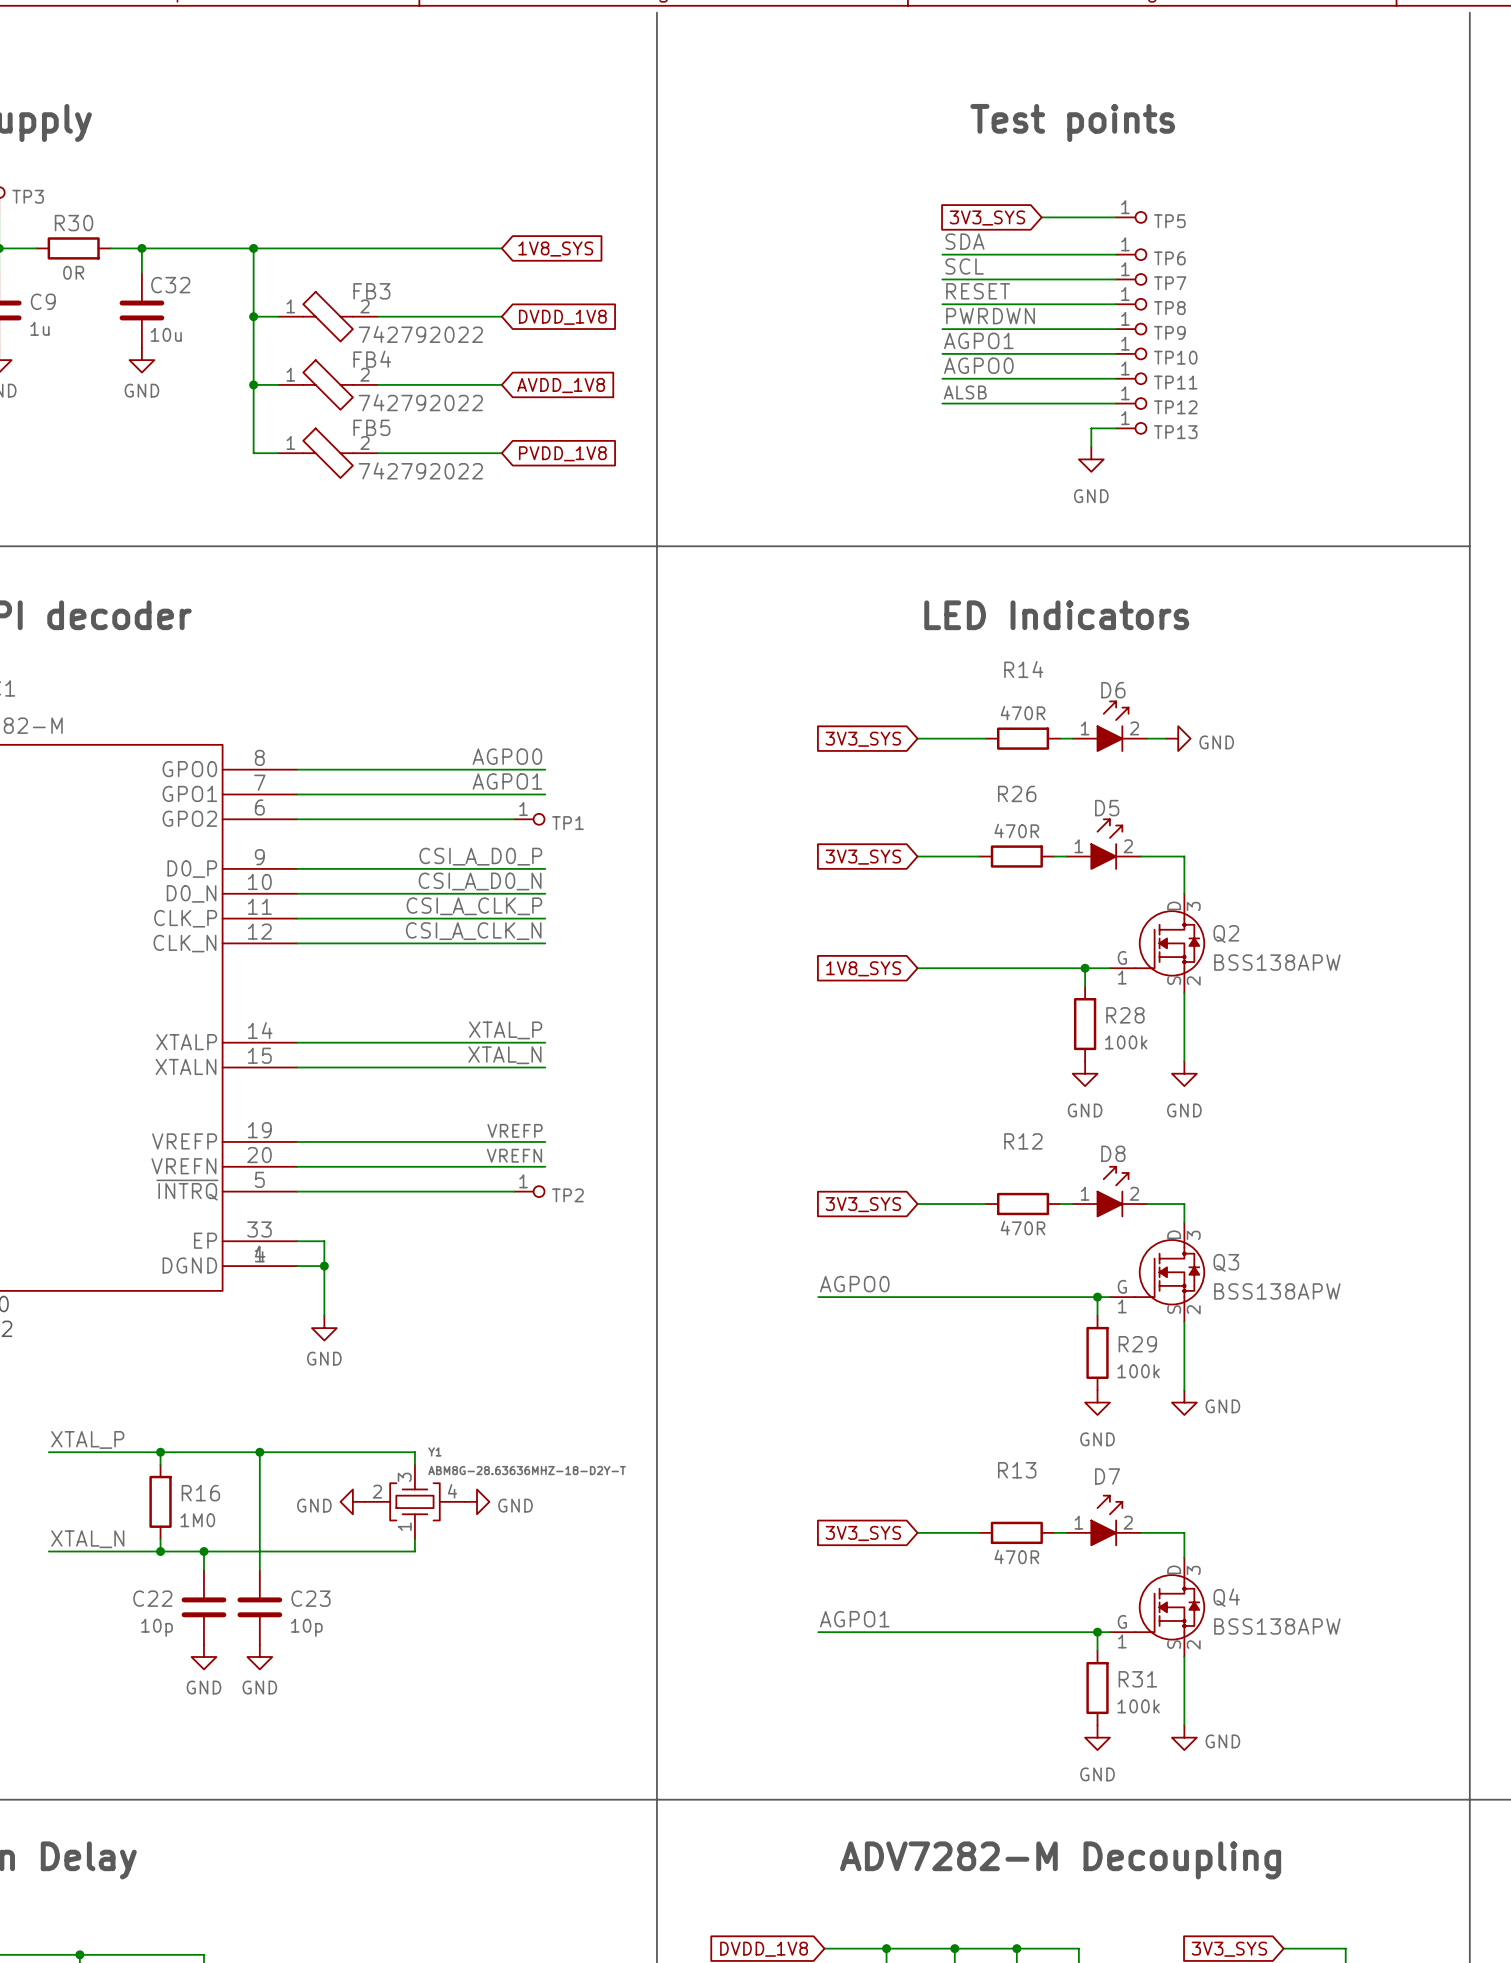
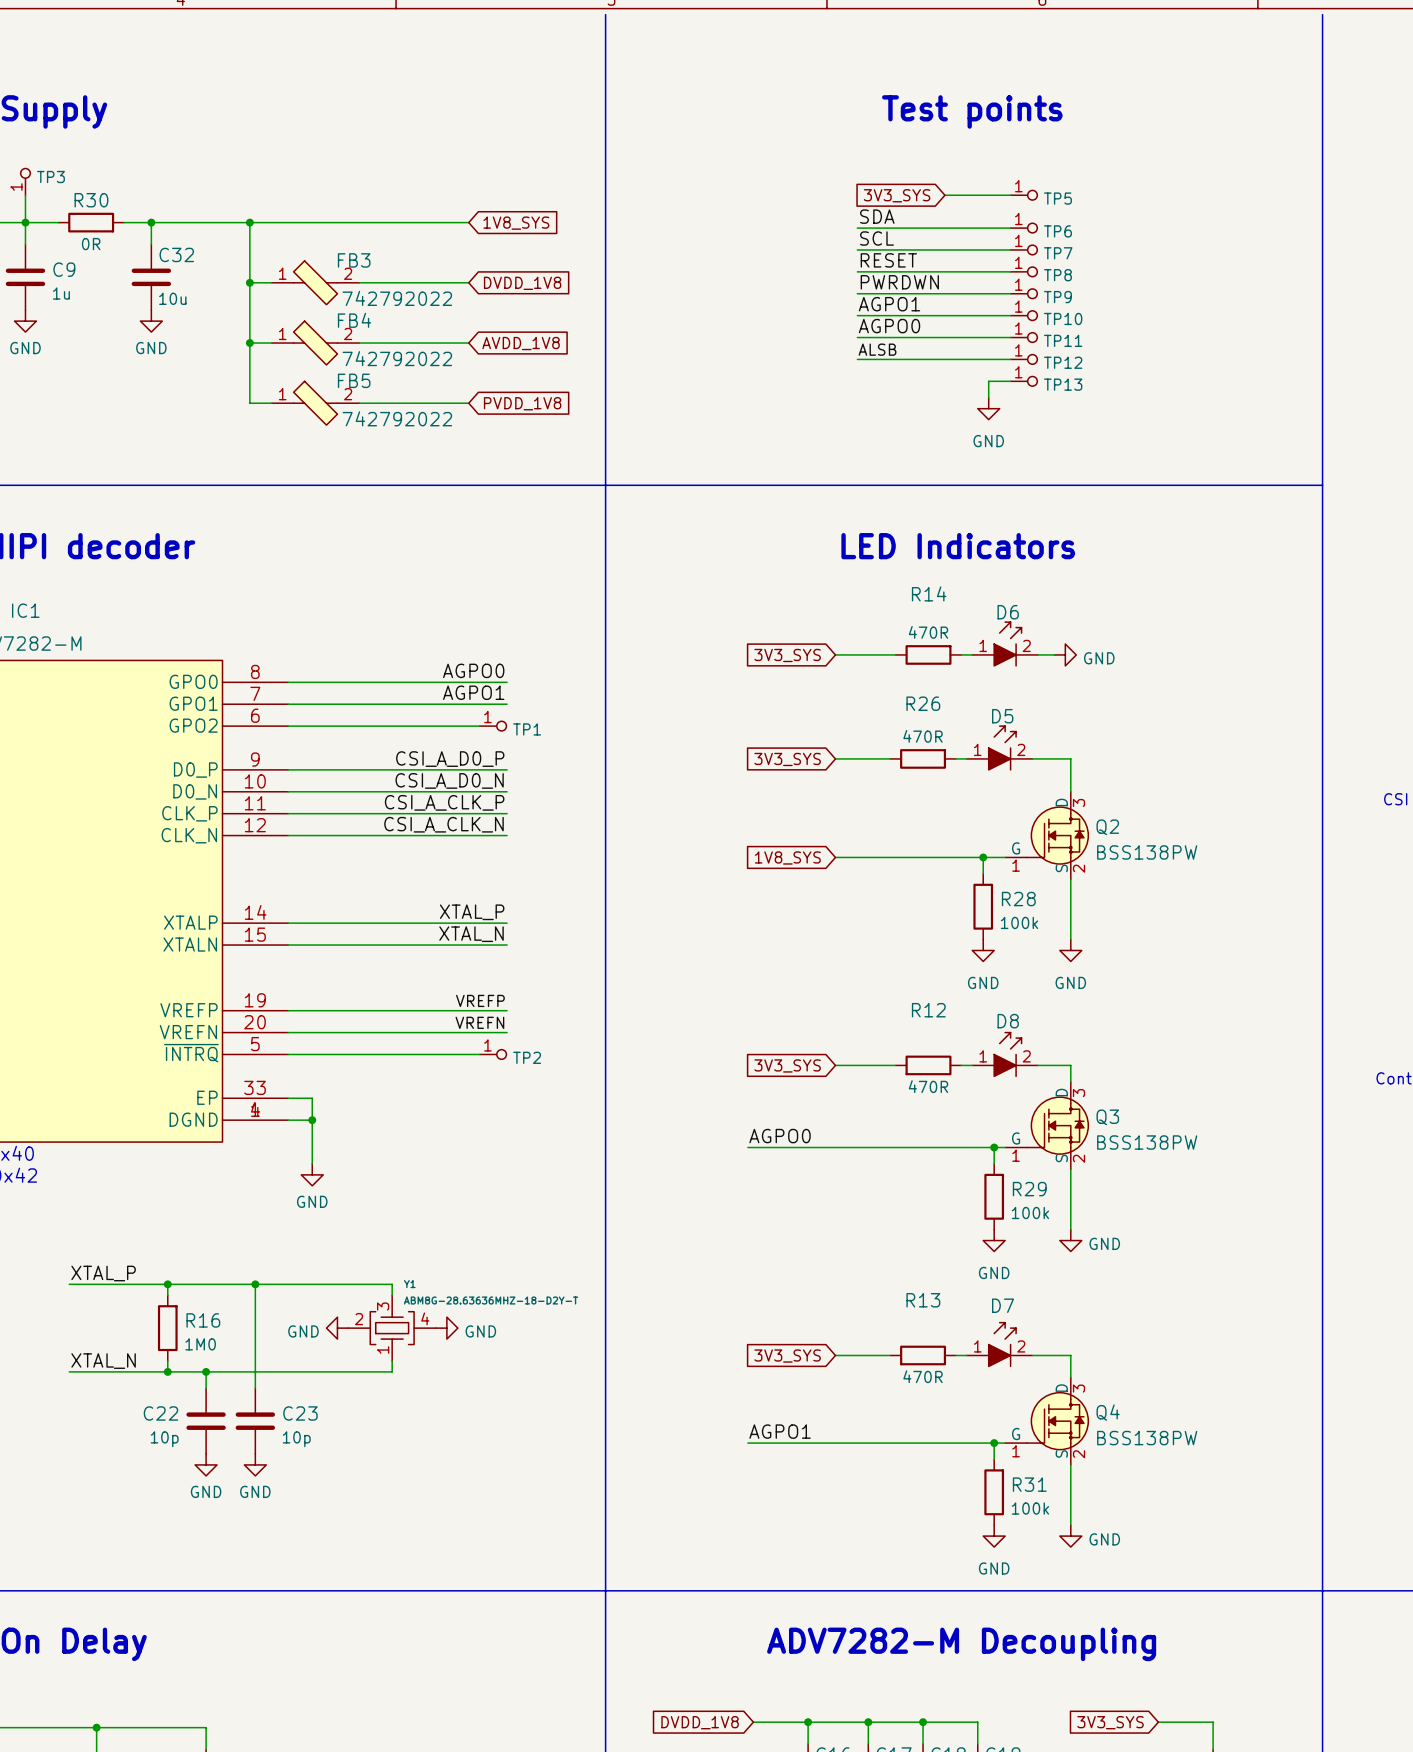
Q2 value: BSS138APW (1277, 962) -> BSS138PW (1147, 852)
Q3 value: BSS138APW (1277, 1291) -> BSS138PW (1147, 1142)
Q4 value: BSS138APW (1277, 1626) -> BSS138PW (1147, 1438)

